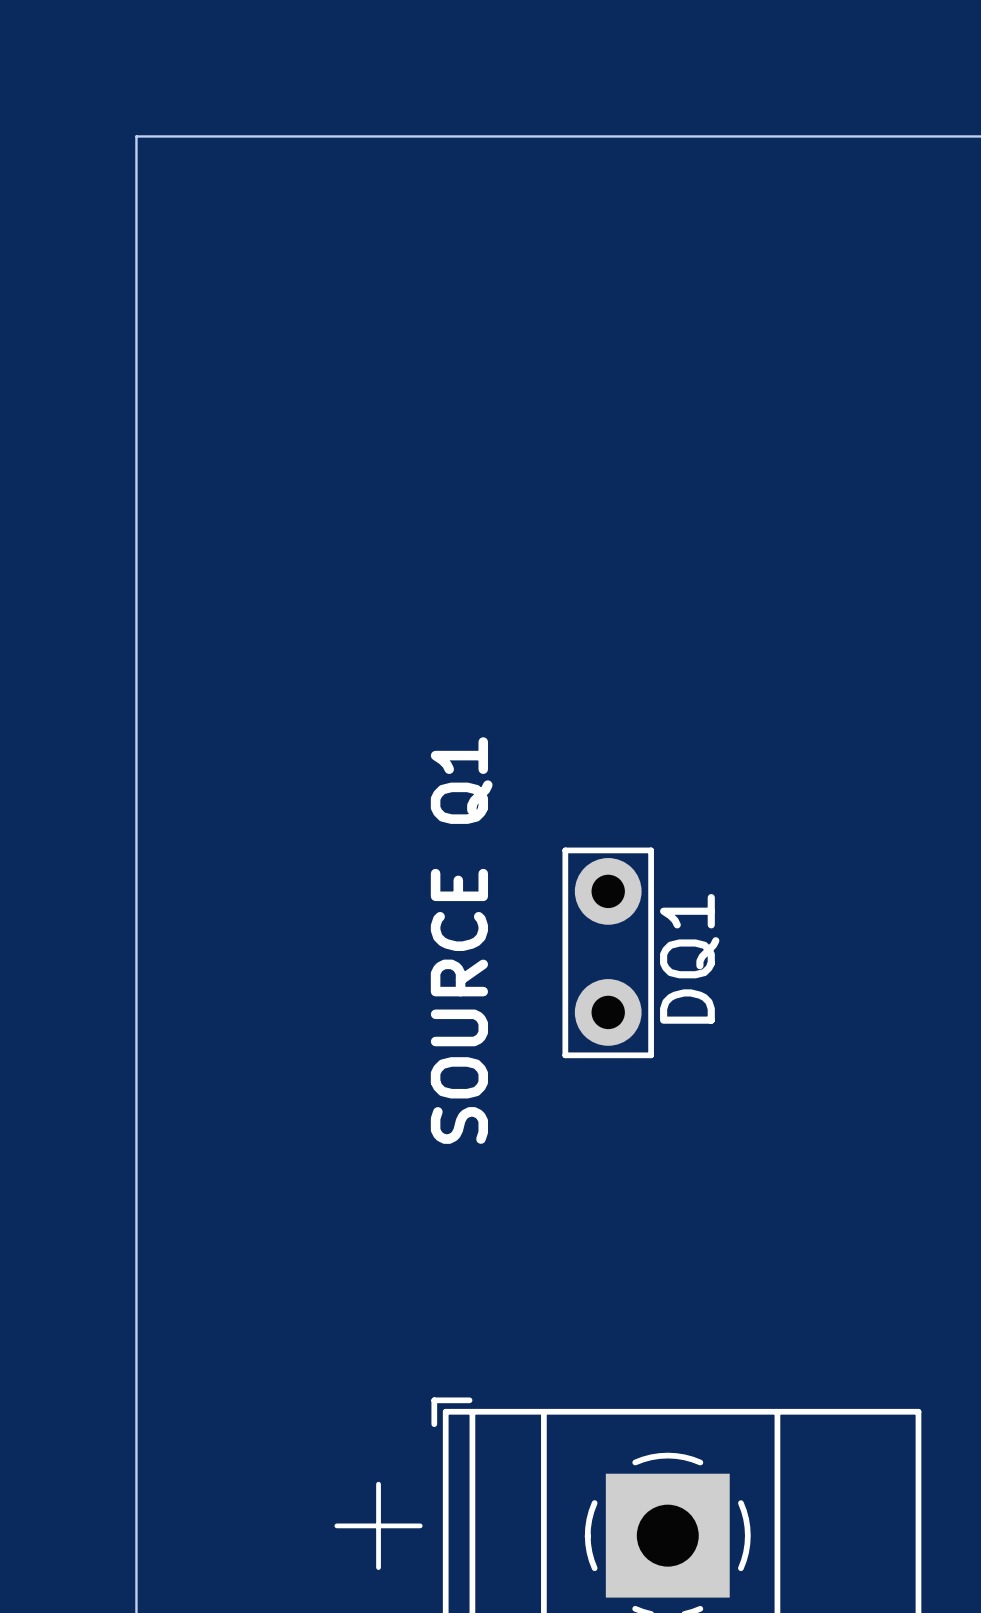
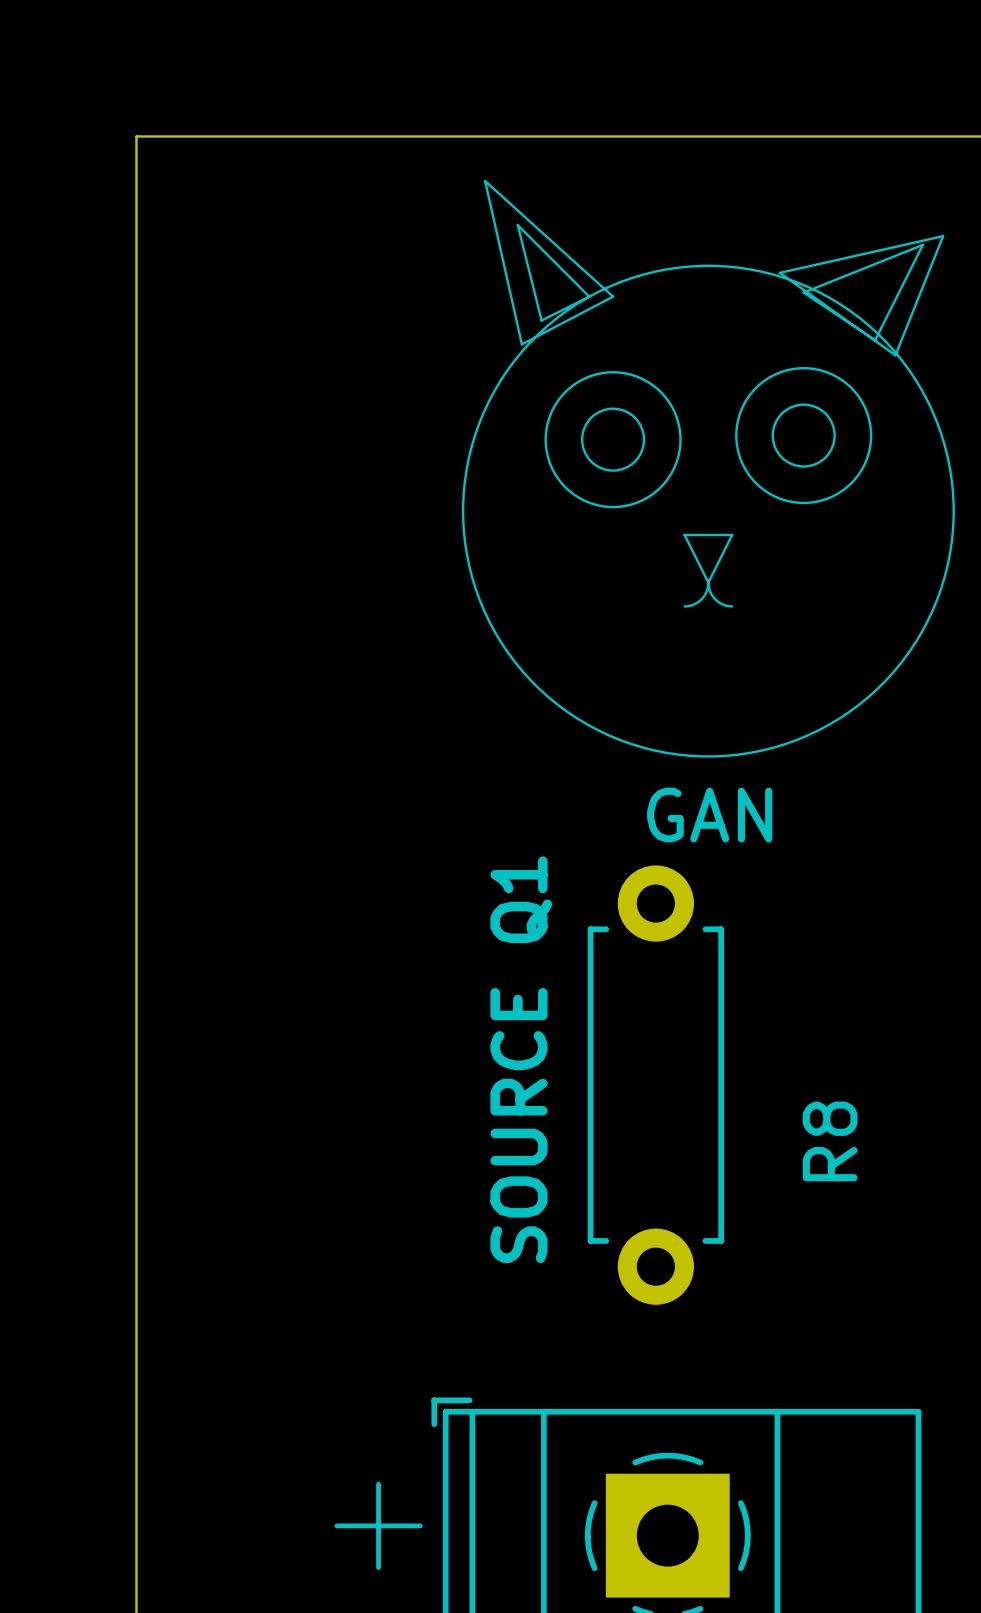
line: none -> (485, 181) (521, 344) (613, 296) (485, 181)
line: none -> (517, 225) (541, 320) (589, 296) (517, 225)
line: none -> (943, 236) (779, 272) (895, 355) (943, 236)
line: none -> (922, 244) (803, 292) (875, 340) (922, 244)
drawing: none -> [461, 264, 955, 758]
line: none -> (708, 582) (732, 534) (684, 534) (708, 582)
line: none -> (708, 582) (706, 591) (701, 599) (693, 604) (684, 606)
line: none -> (708, 582) (710, 591) (715, 599) (723, 604) (732, 606)
text: none -> GAN (709, 815)
text position: SOURCE Q1 (461, 940) -> SOURCE Q1 (521, 1059)
DQ1: (608, 952) -> none
R8: none -> (655, 1085)

